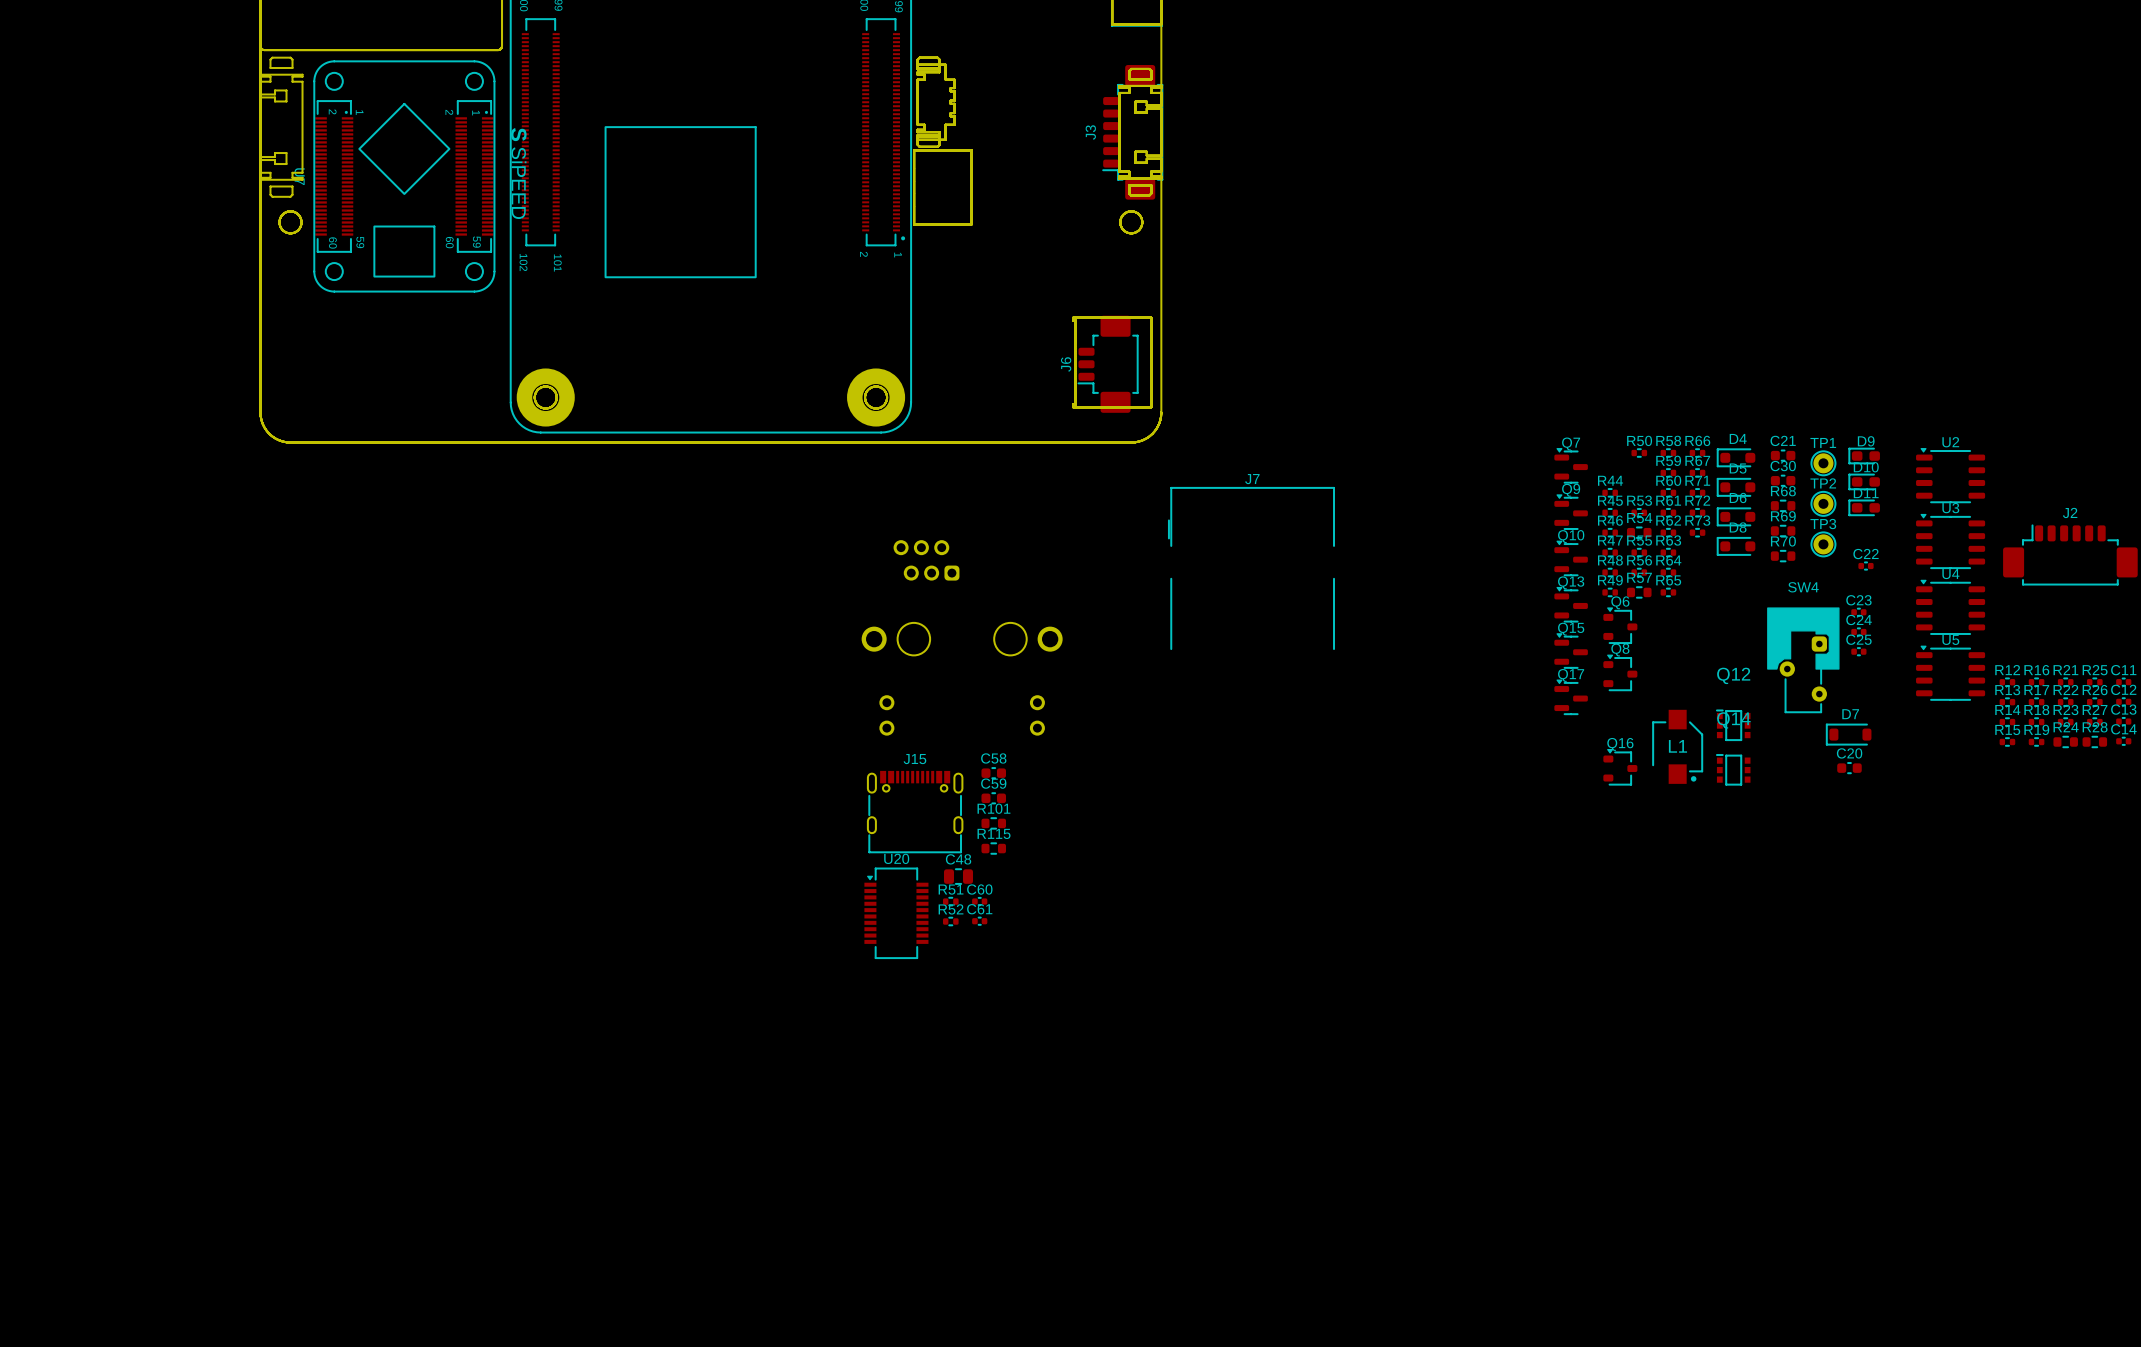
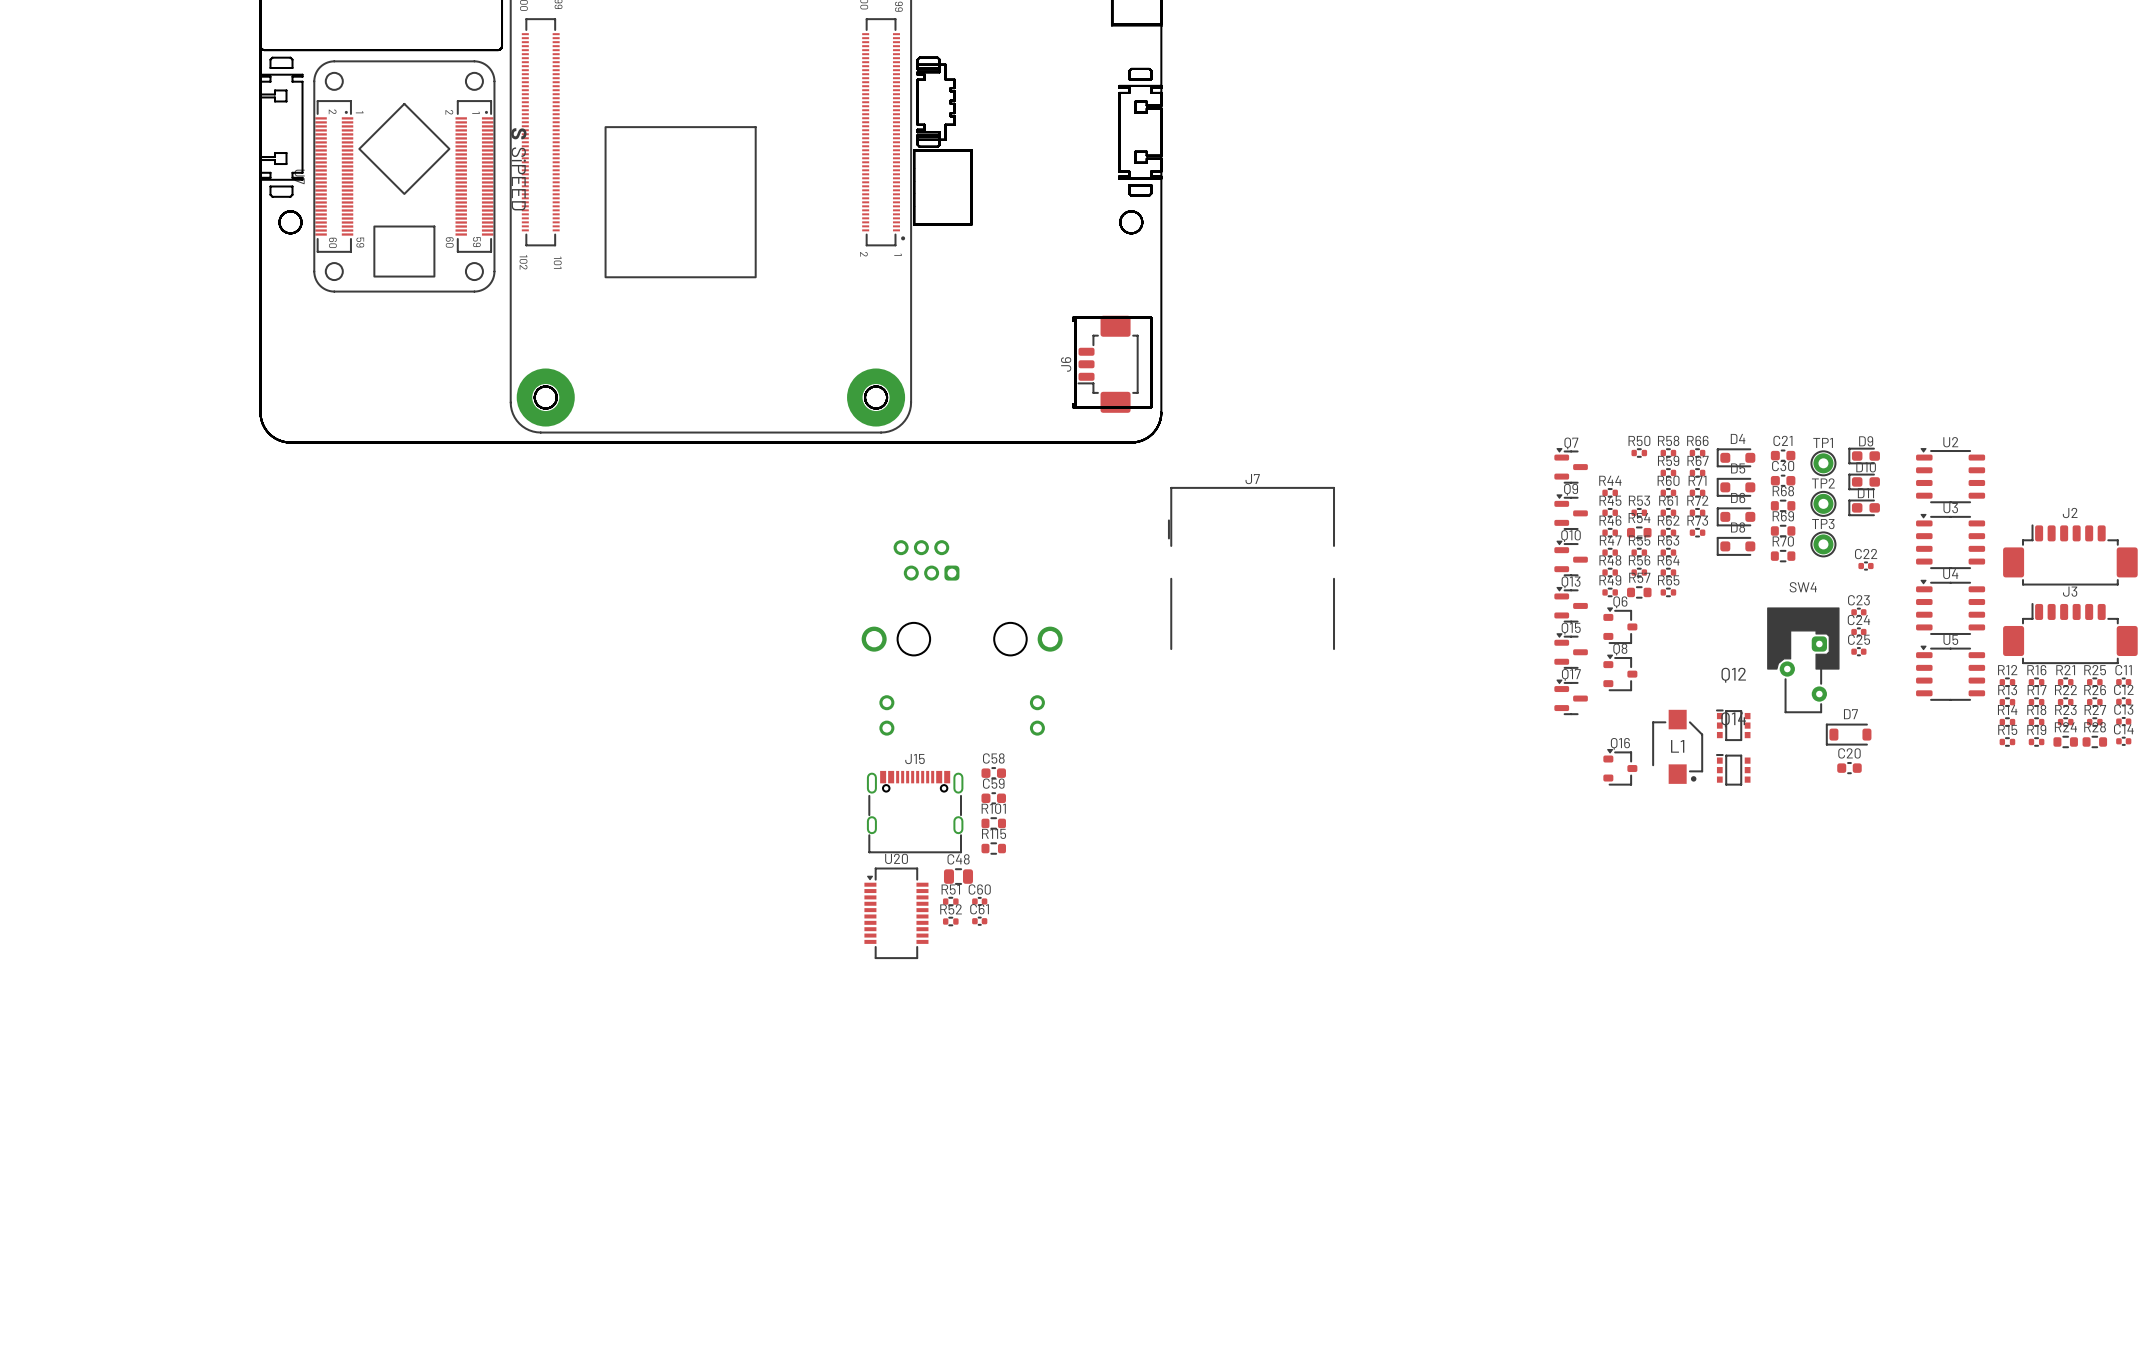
J3 rotation: 0° (1132, 132) -> 90° clockwise (2070, 633)
J3 position: (1132, 132) -> (2070, 633)

